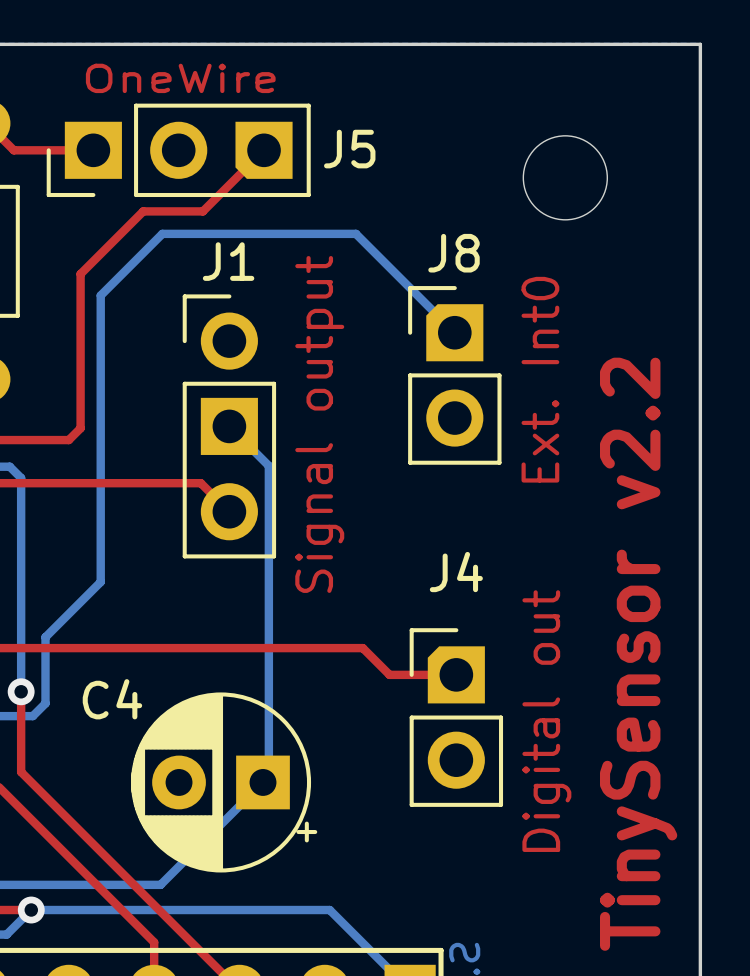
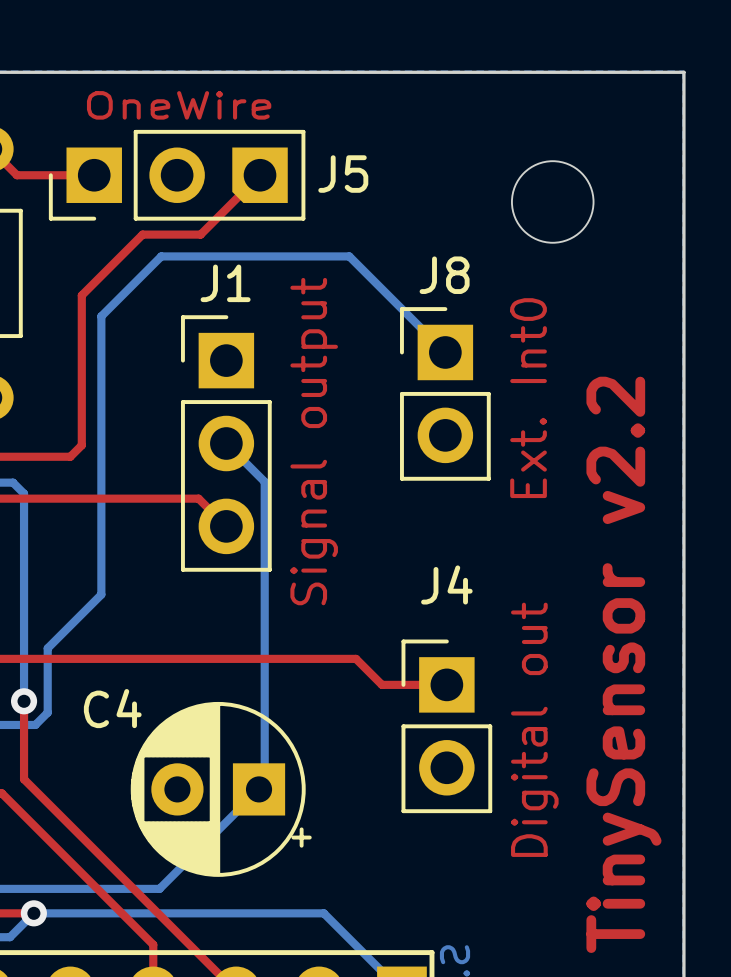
J8 footprint: [408, 286, 502, 465] -> [400, 307, 491, 481]
J1 footprint: [182, 294, 277, 559] -> [181, 315, 272, 572]
J4 footprint: [409, 628, 504, 807] -> [401, 639, 493, 814]

